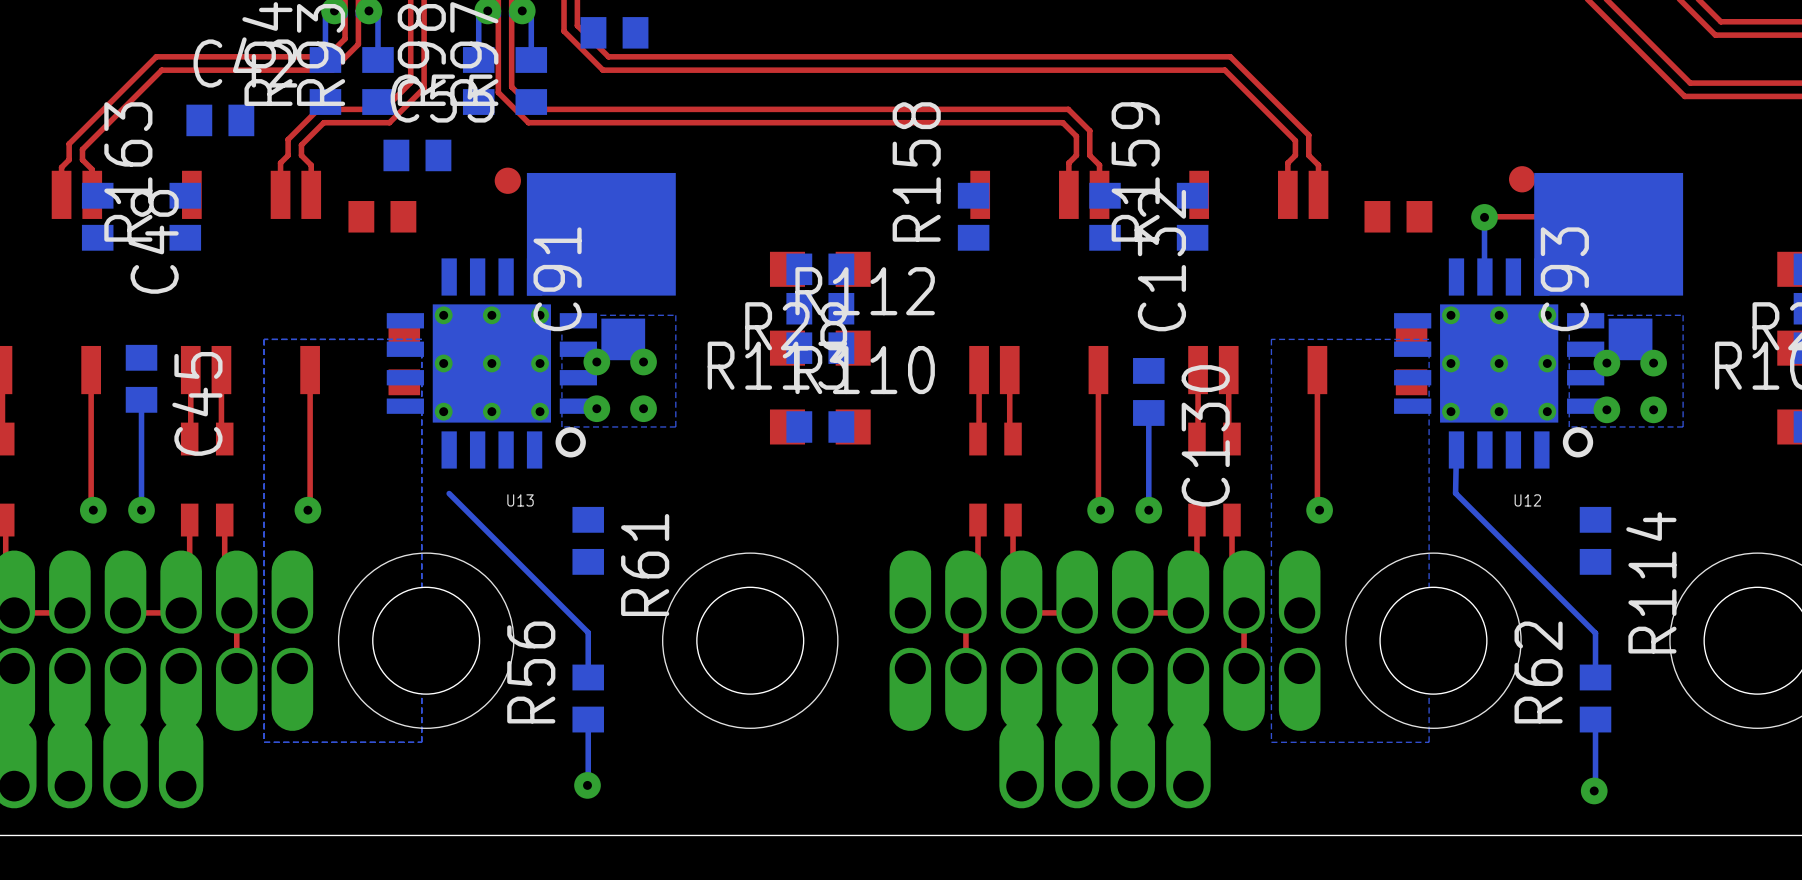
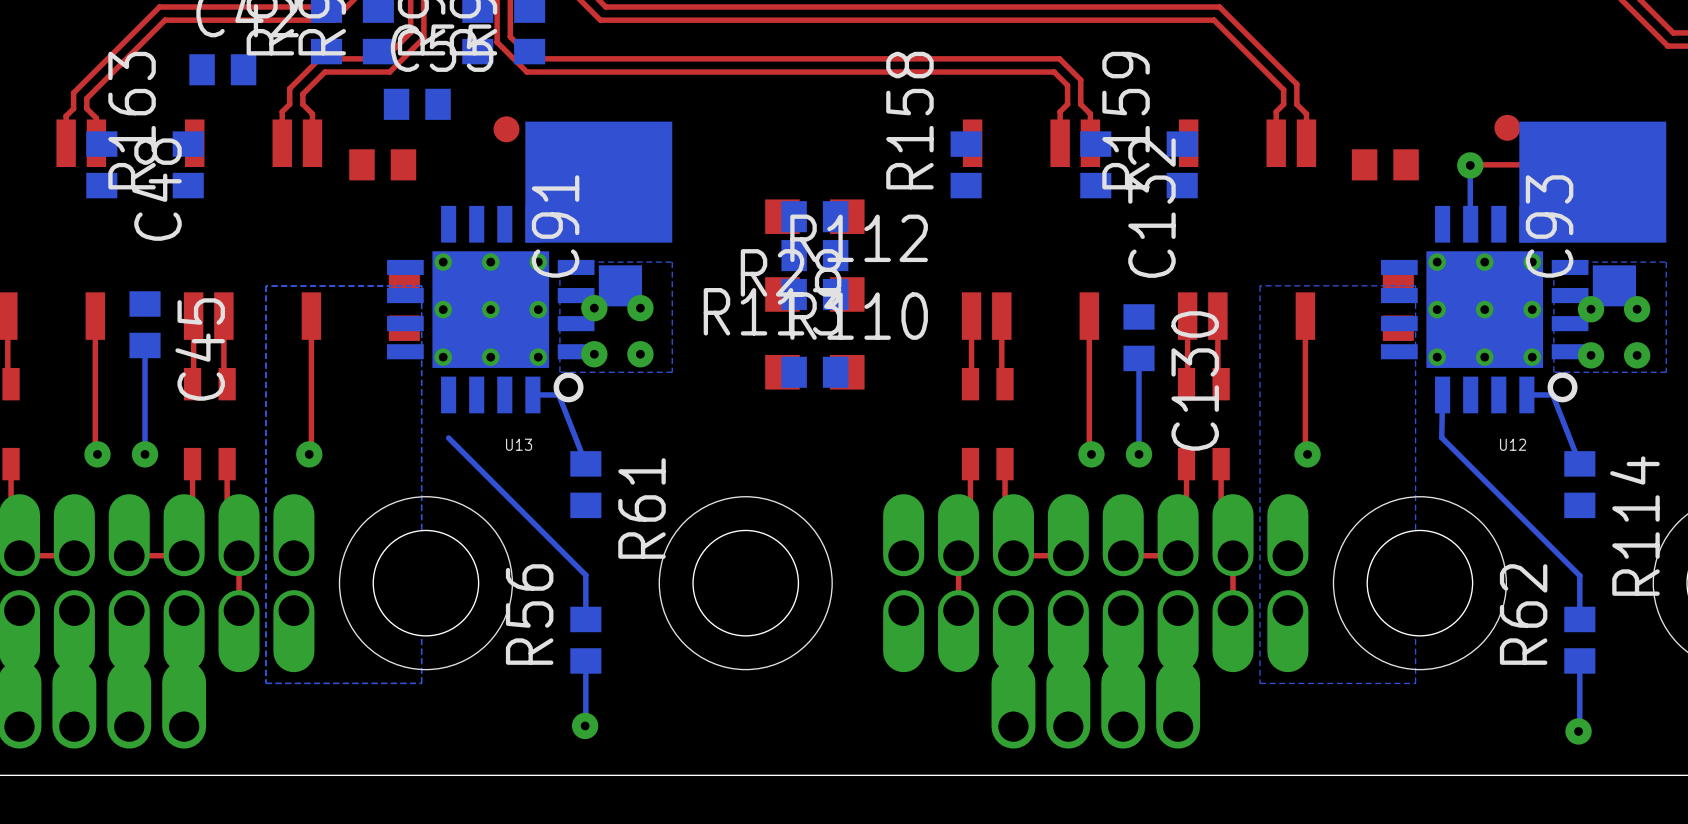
bottom track: none -> (532, 394) (558, 394) (585, 463)
bottom track: none -> (1526, 394) (1552, 394) (1579, 463)

